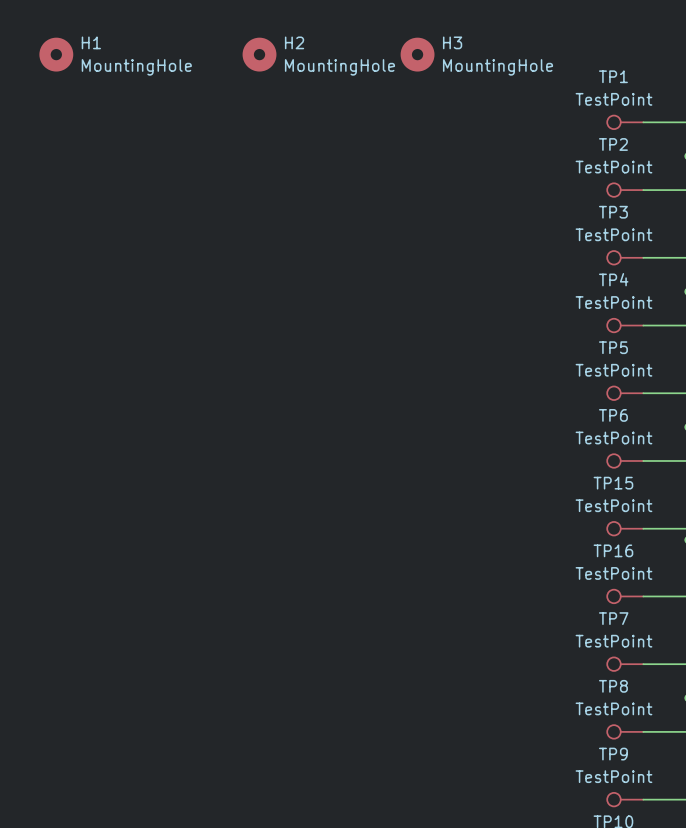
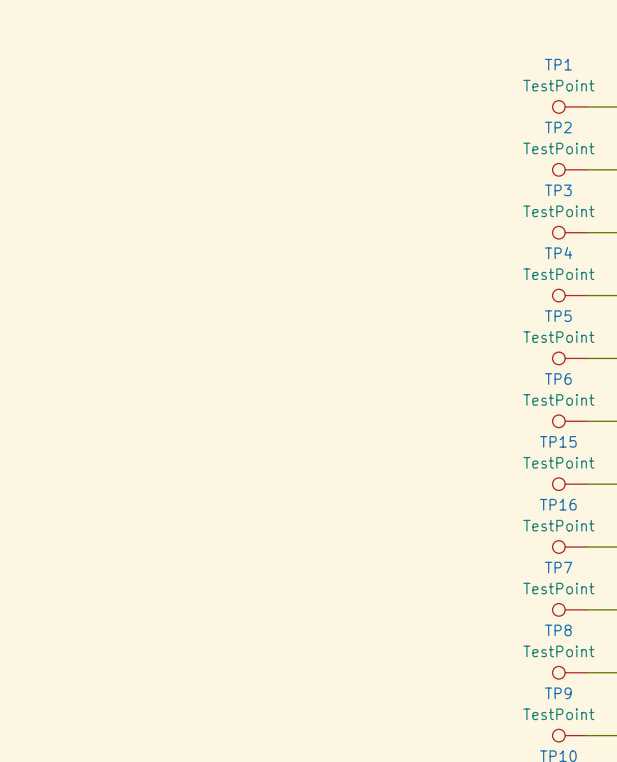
H1: MountingHole (56, 54) -> none
H2: MountingHole (259, 54) -> none
H3: MountingHole (417, 54) -> none

